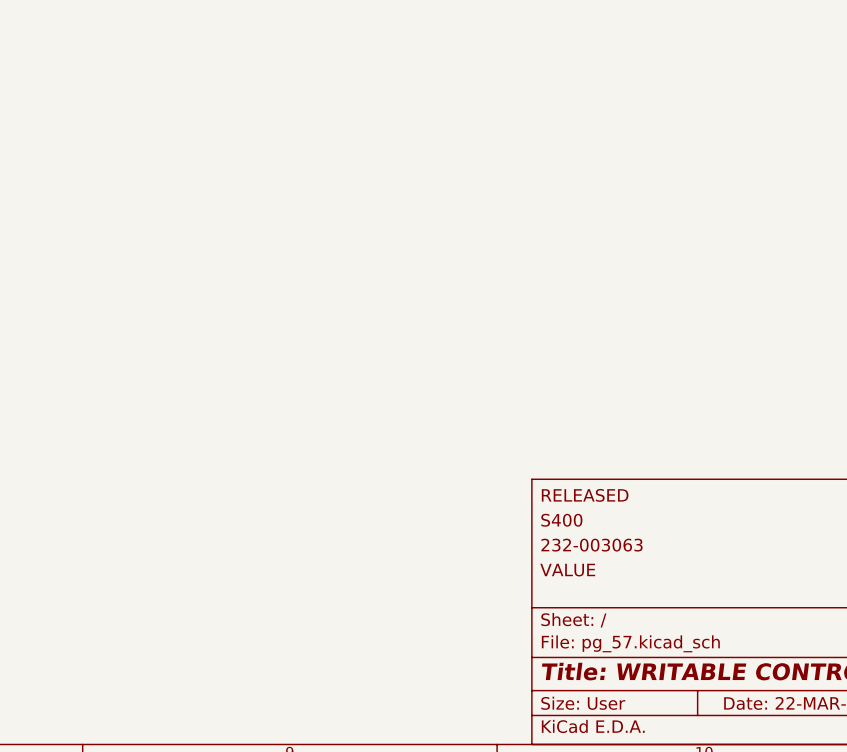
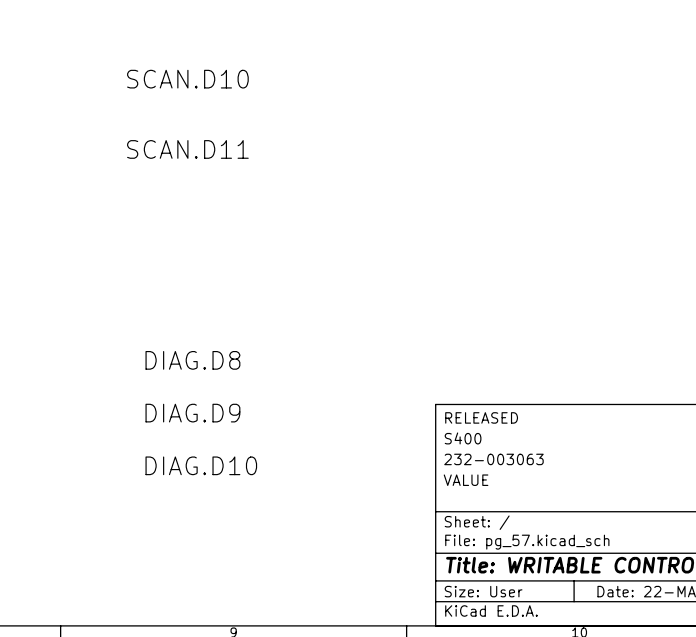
label: none -> SCAN.D10 (187, 79)
label: none -> SCAN.D11 (187, 149)
label: none -> DIAG.D8 (192, 360)
label: none -> DIAG.D9 (192, 413)
label: none -> DIAG.D10 (201, 465)

